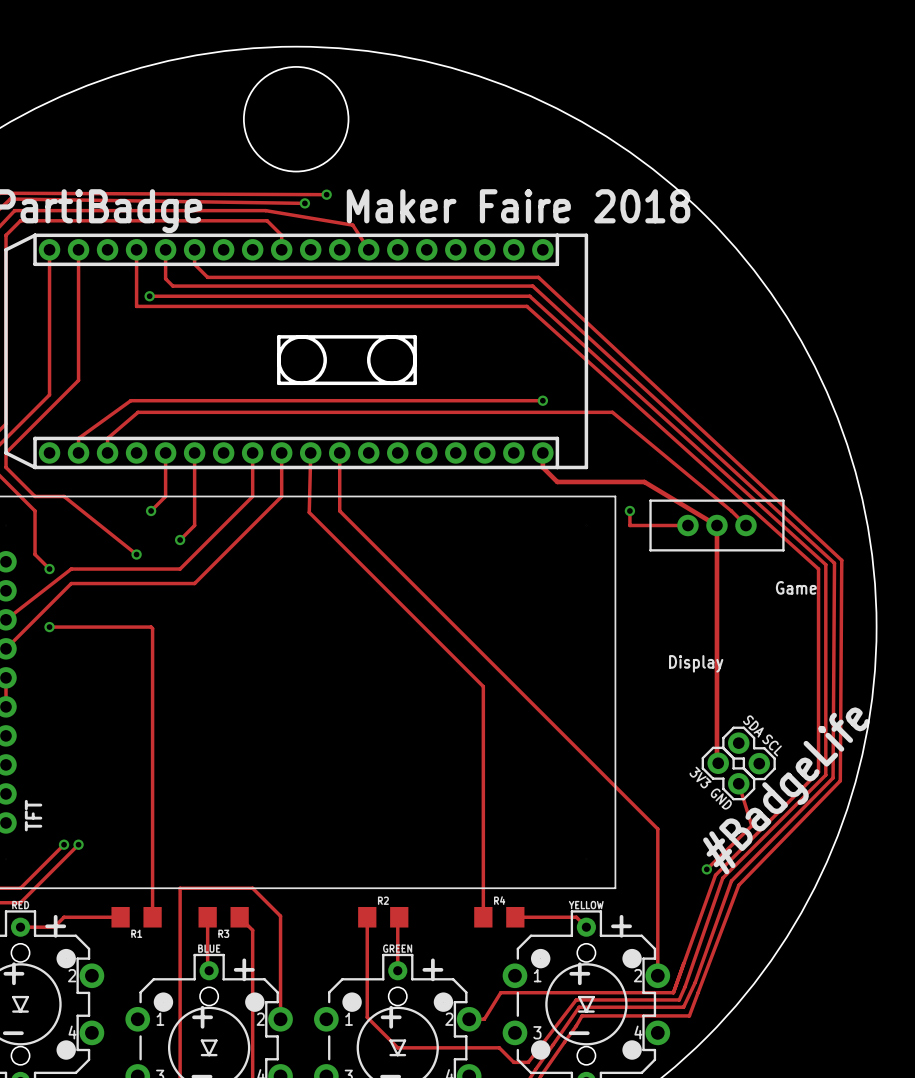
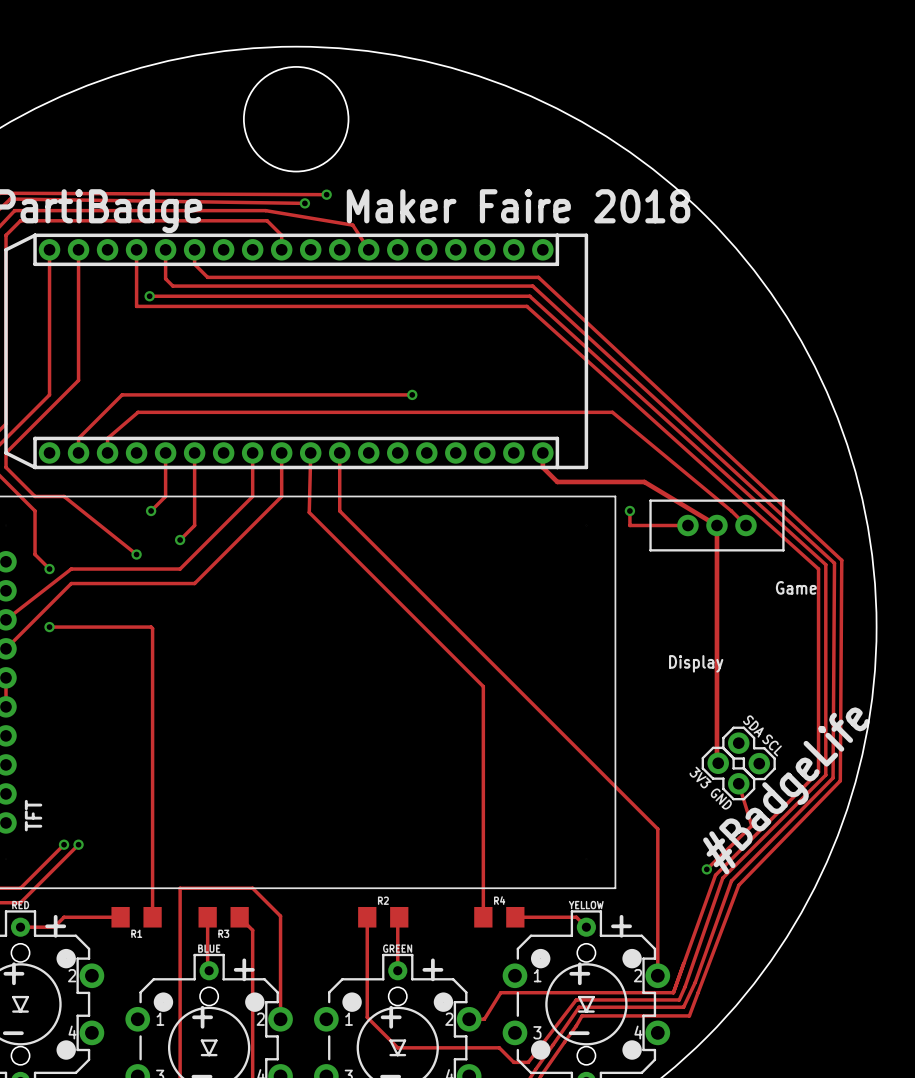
round board edge: [277, 335, 327, 386] -> none
round board edge: [367, 335, 417, 386] -> none
board edge: (278, 336) (415, 336) (415, 383) (278, 383) (278, 336) -> none
via: none -> (412, 394)
track: (542, 400) (130, 400) (78, 438) -> (412, 394) (122, 394) (78, 438)
via: (542, 400) -> none

